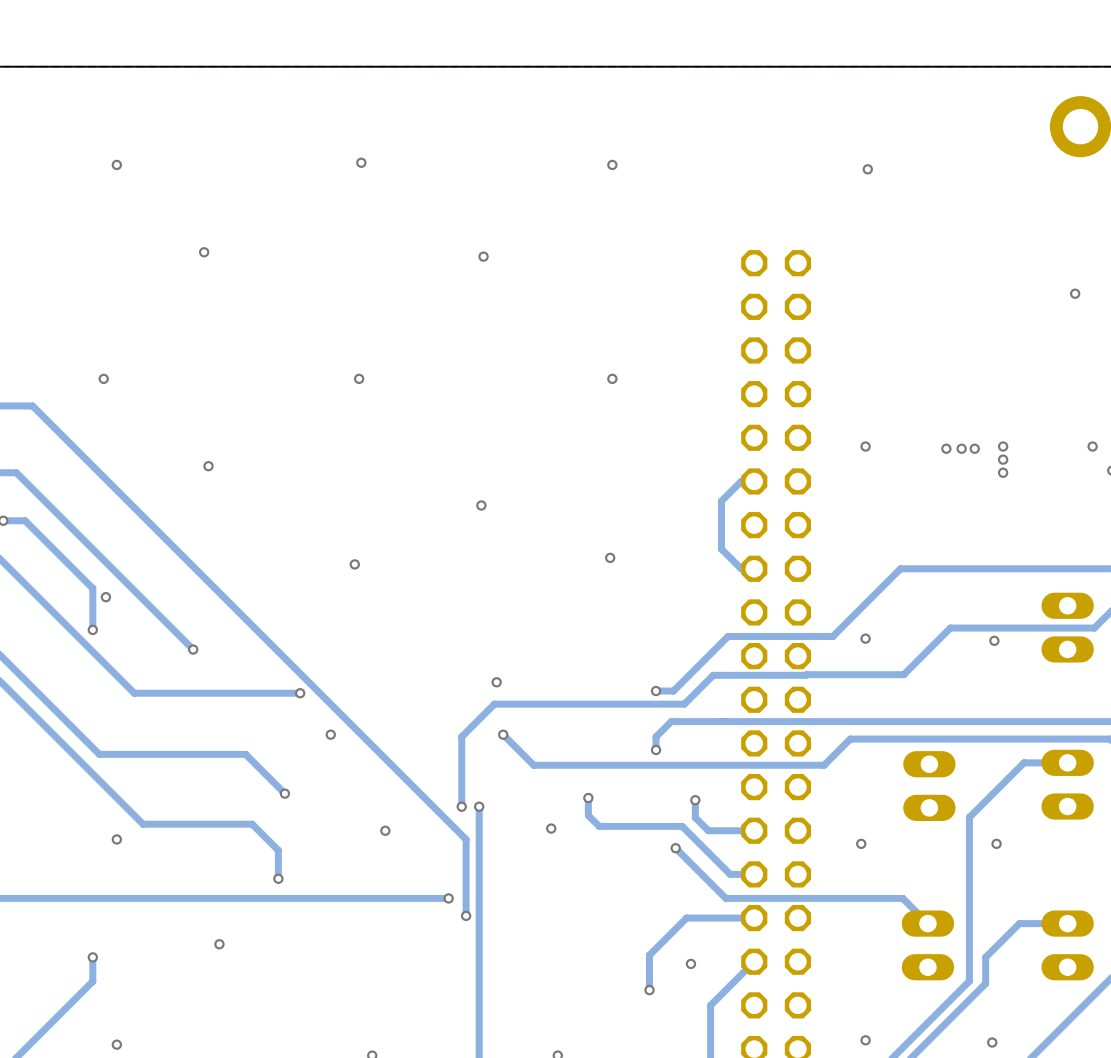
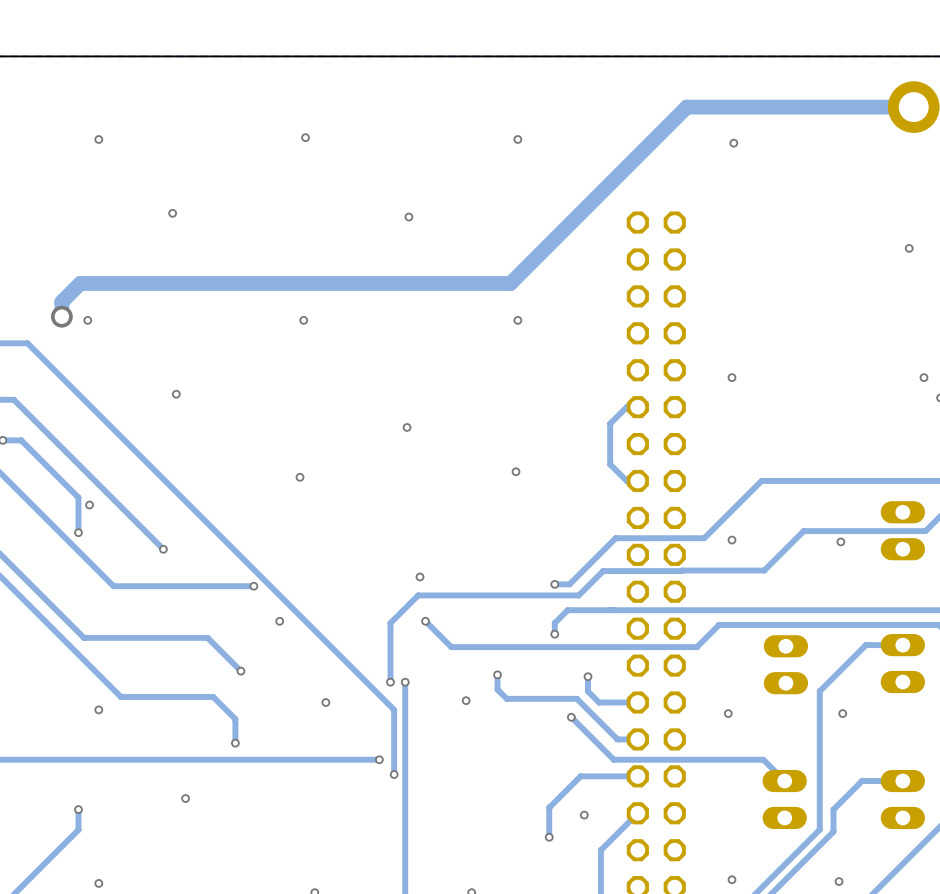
track: none -> (913, 107) (686, 107) (510, 283) (80, 283) (61, 301) (61, 316)
via: none -> (61, 316)
via: (1003, 446) -> none
via: (946, 448) -> none
via: (961, 448) -> none
via: (974, 448) -> none
via: (1003, 459) -> none
via: (1003, 472) -> none

